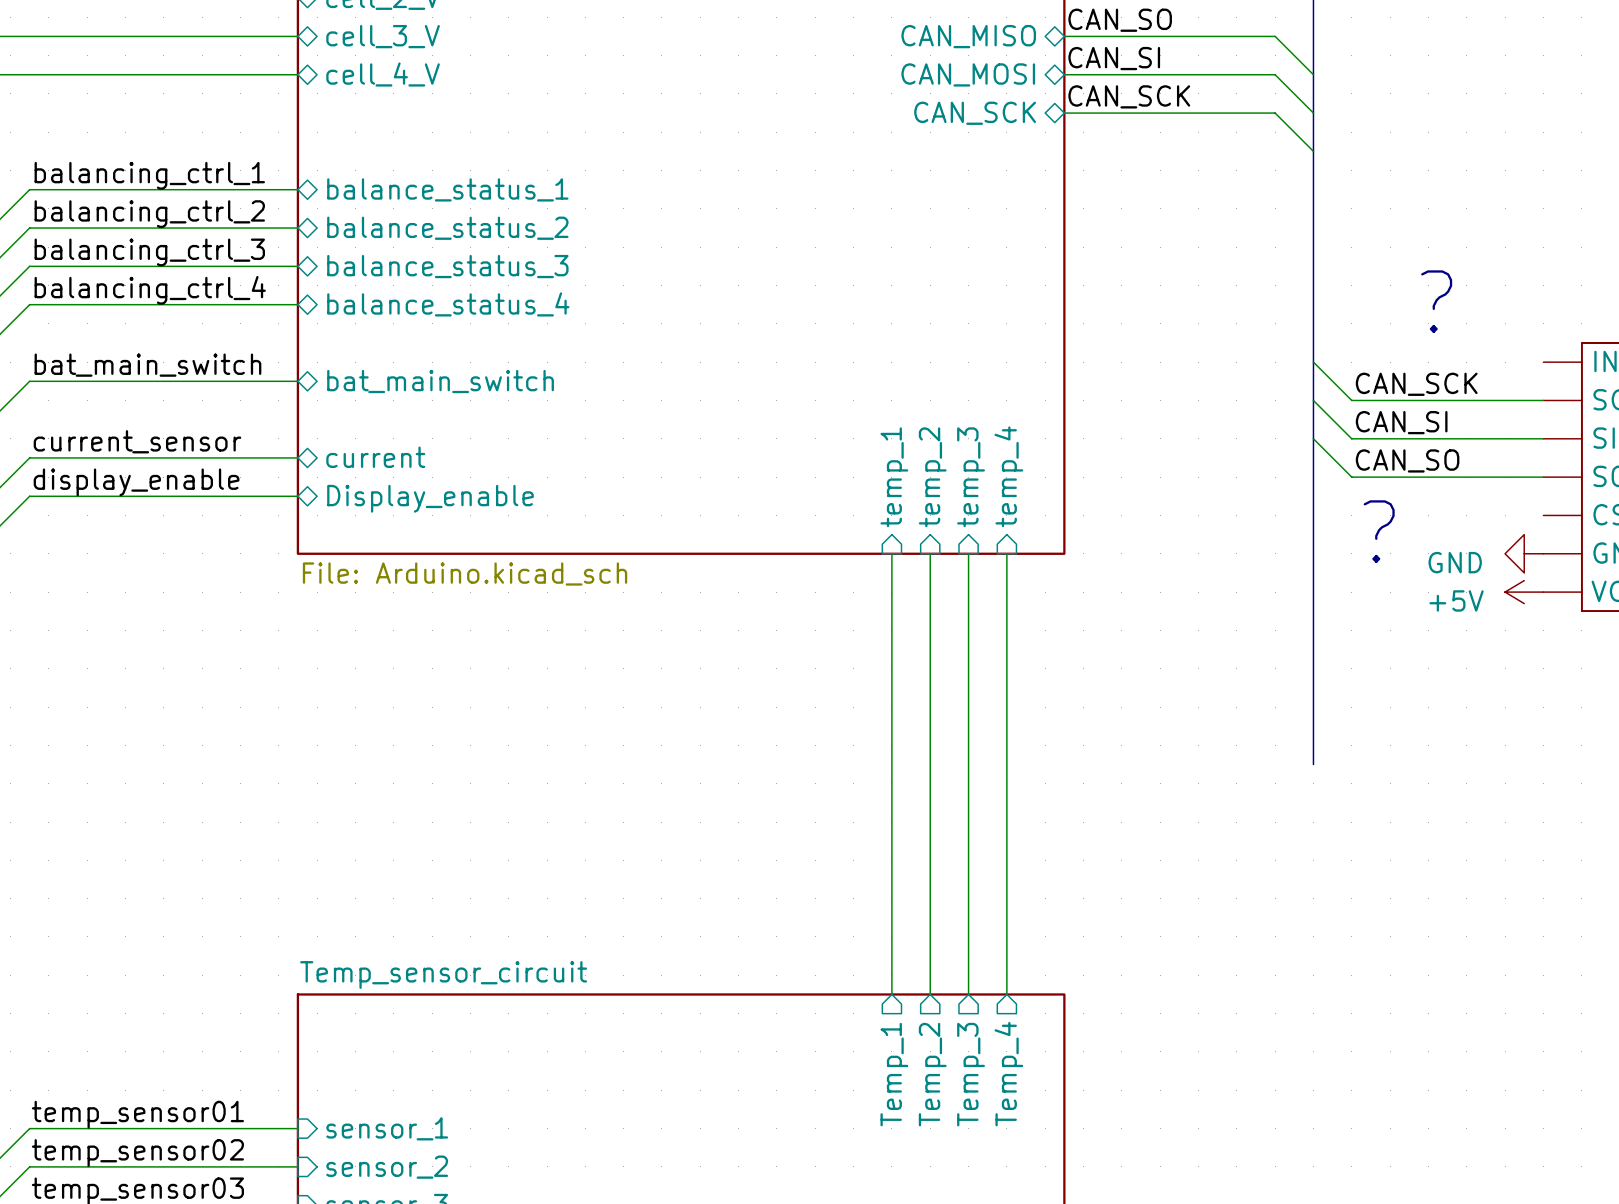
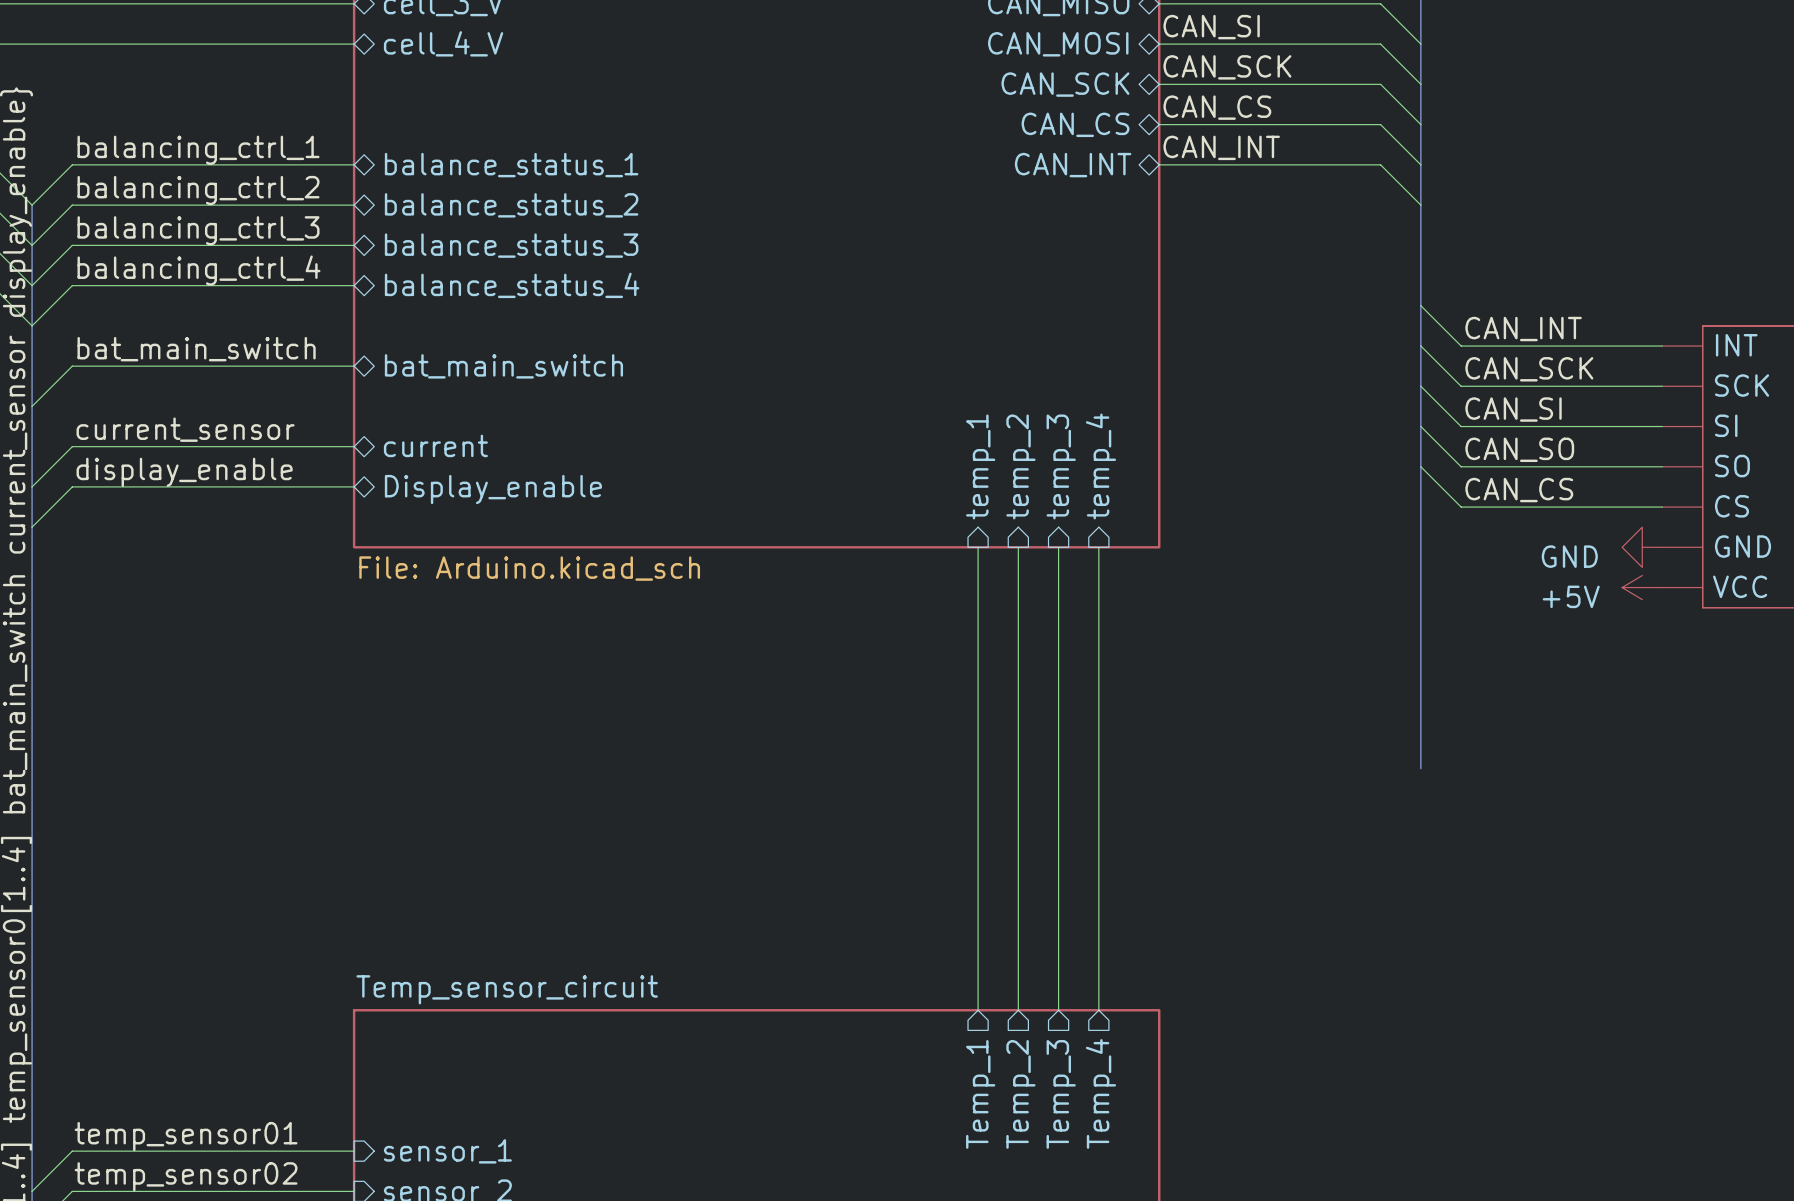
label: none -> CAN_CS (1217, 107)
sheet pin: none -> CAN_CS (1075, 124)
wire: none -> (1159, 124) (1380, 124) (1420, 164)
label: none -> CAN_INT (1221, 147)
sheet pin: none -> CAN_INT (1073, 165)
wire: none -> (1159, 164) (1380, 164) (1420, 205)
text: ? (1436, 301) -> none
wire: none -> (1420, 305) (1461, 346) (1662, 346)
label: none -> CAN_INT (1523, 329)
wire: none -> (1420, 466) (1461, 507) (1662, 507)
label: none -> CAN_CS (1519, 490)
text: ? (1379, 531) -> none

